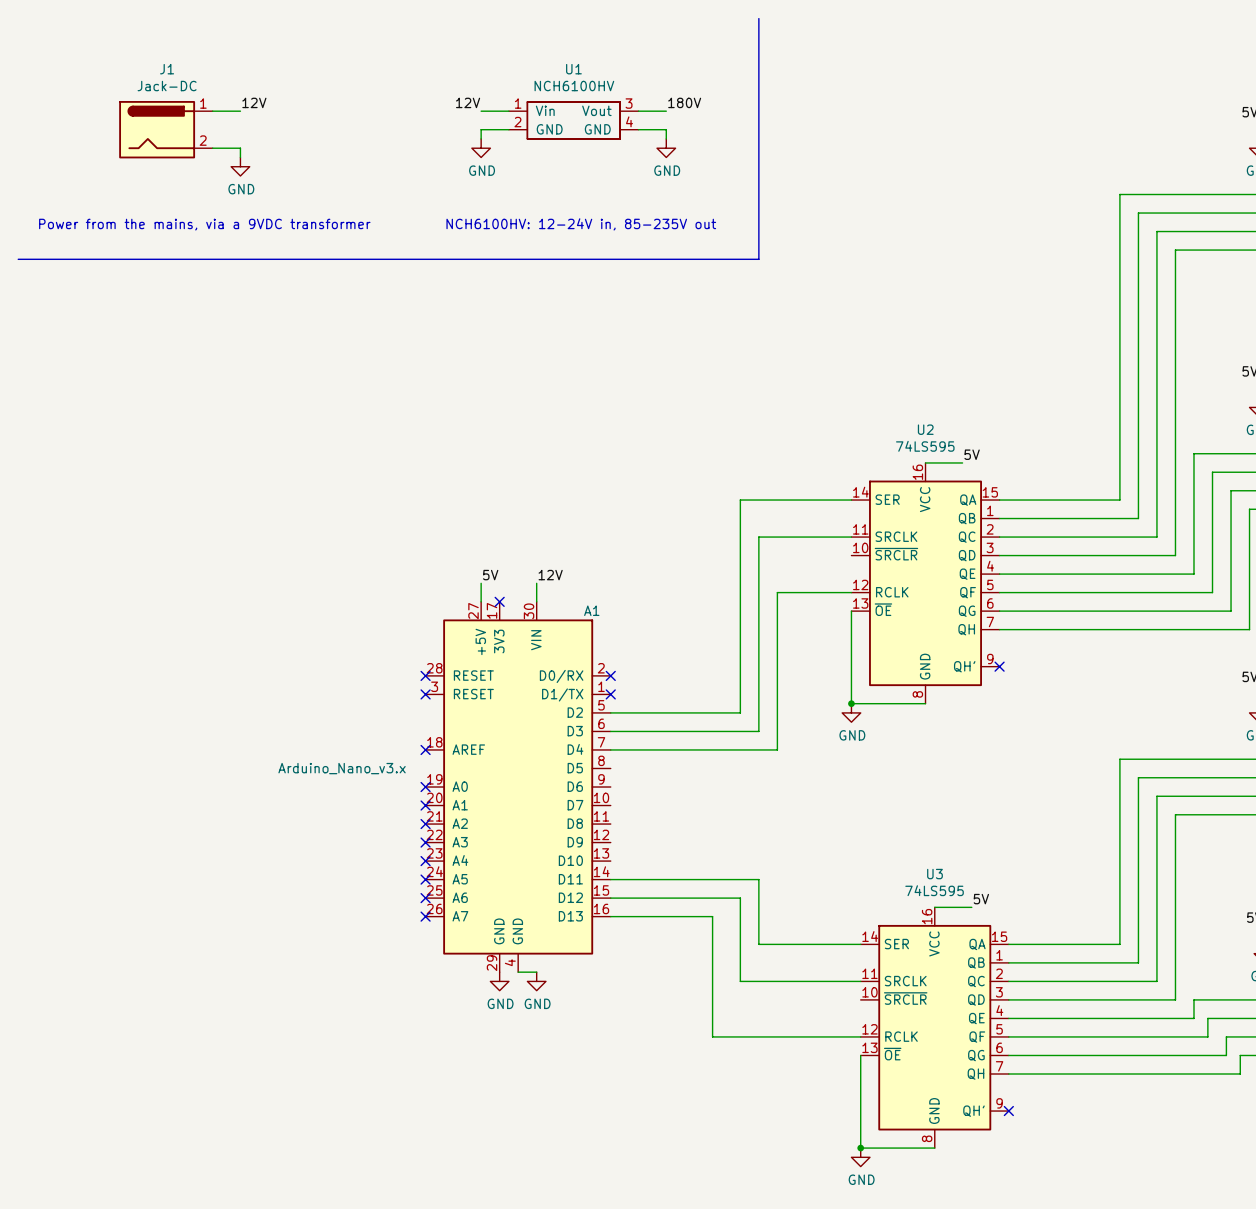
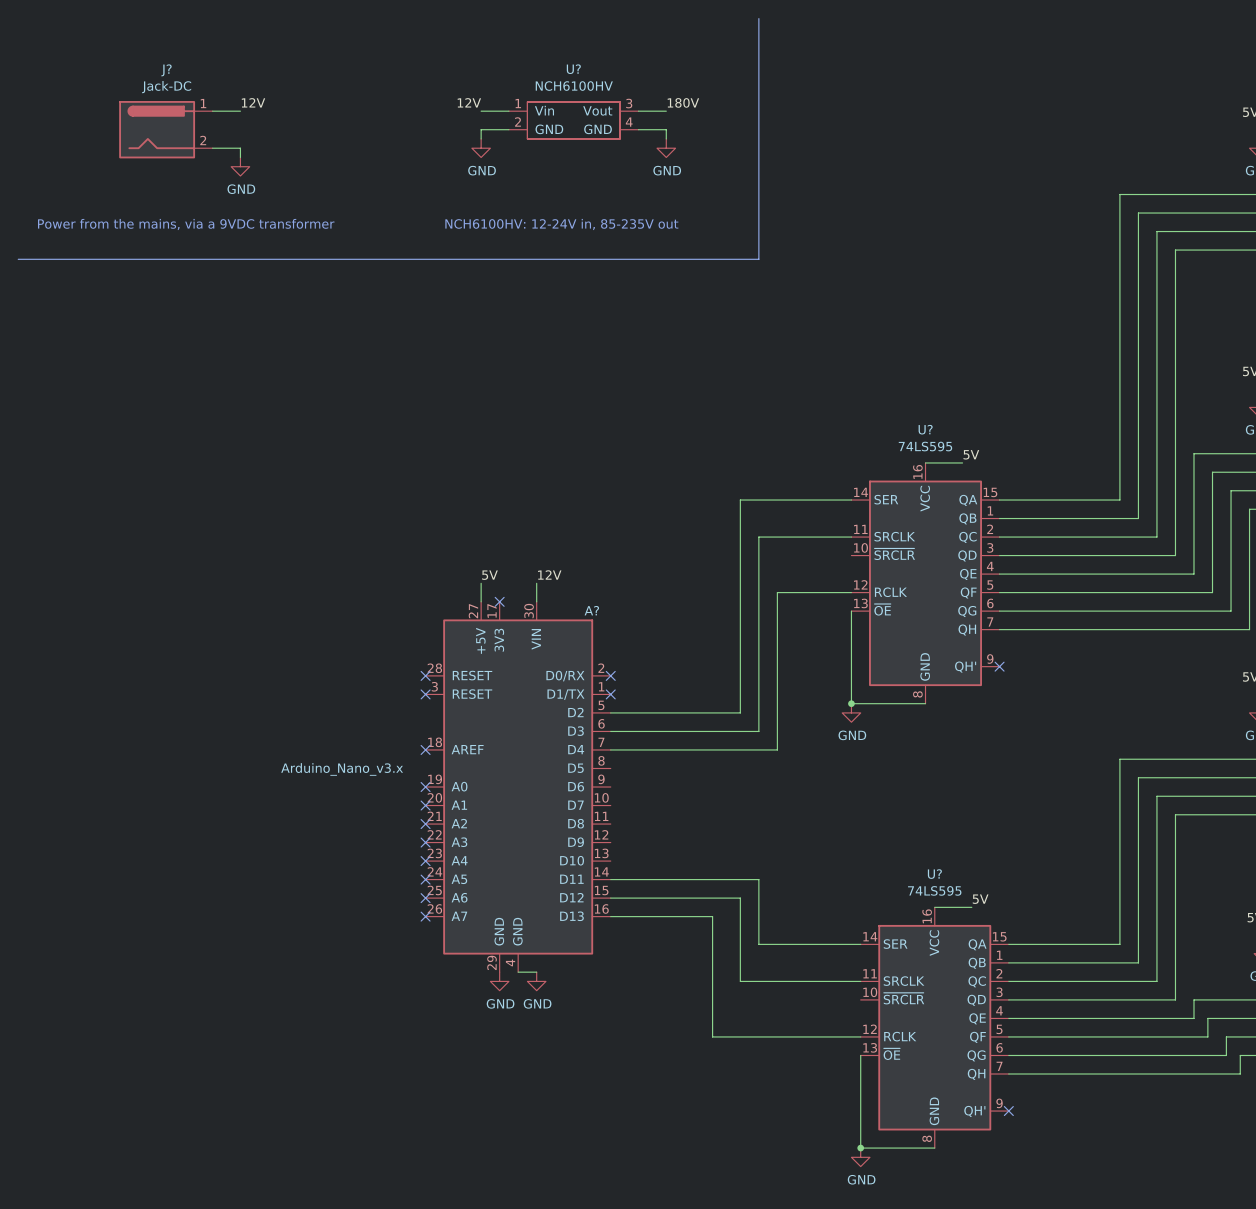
J1 name: J1 (167, 69) -> J? (166, 70)
U1 name: U1 (573, 69) -> U? (573, 69)
U2 name: U2 (925, 429) -> U? (925, 429)
A1 name: A1 (591, 610) -> A? (591, 610)
U3 name: U3 (934, 874) -> U? (934, 874)

